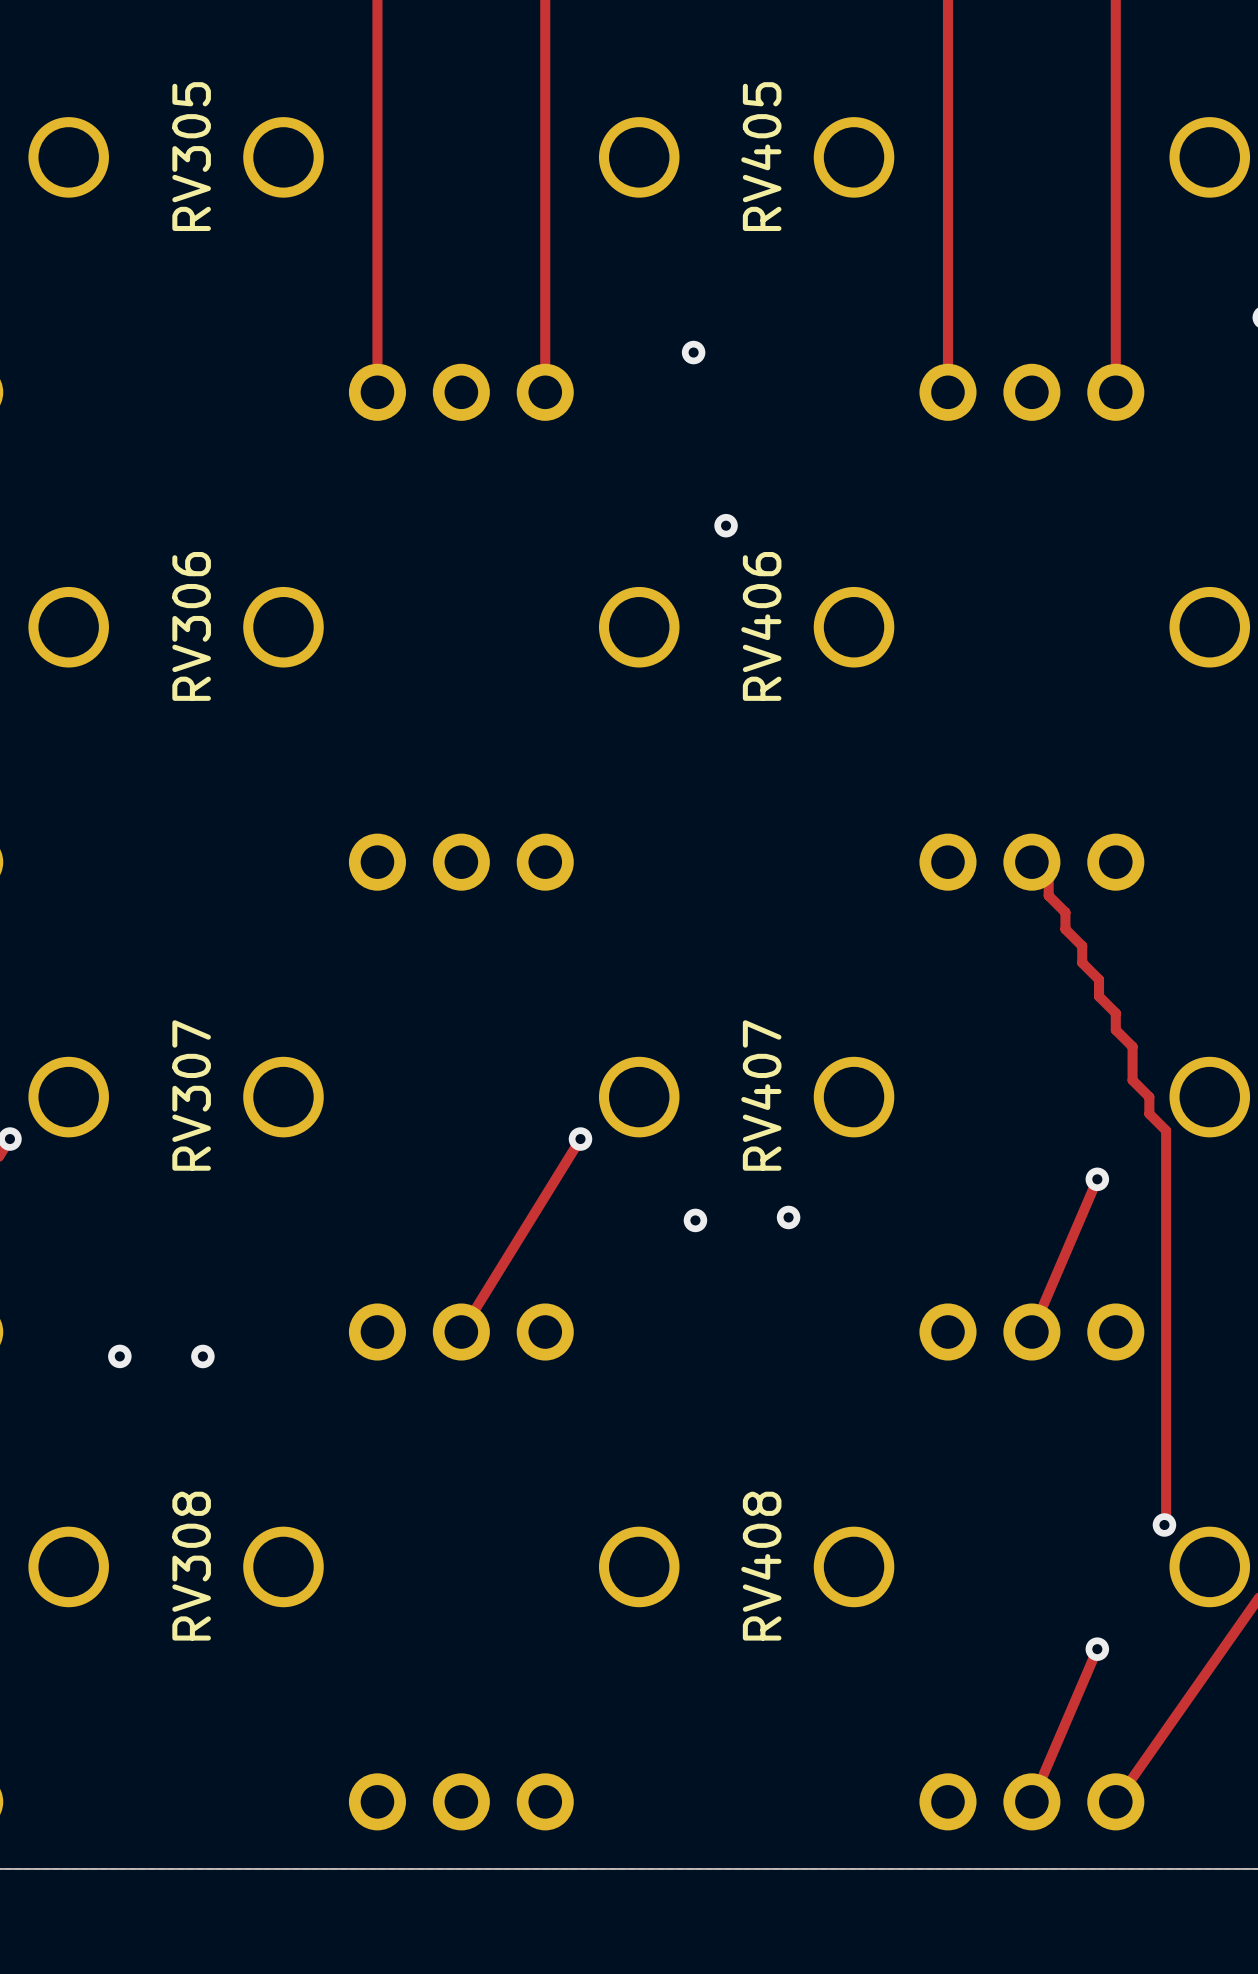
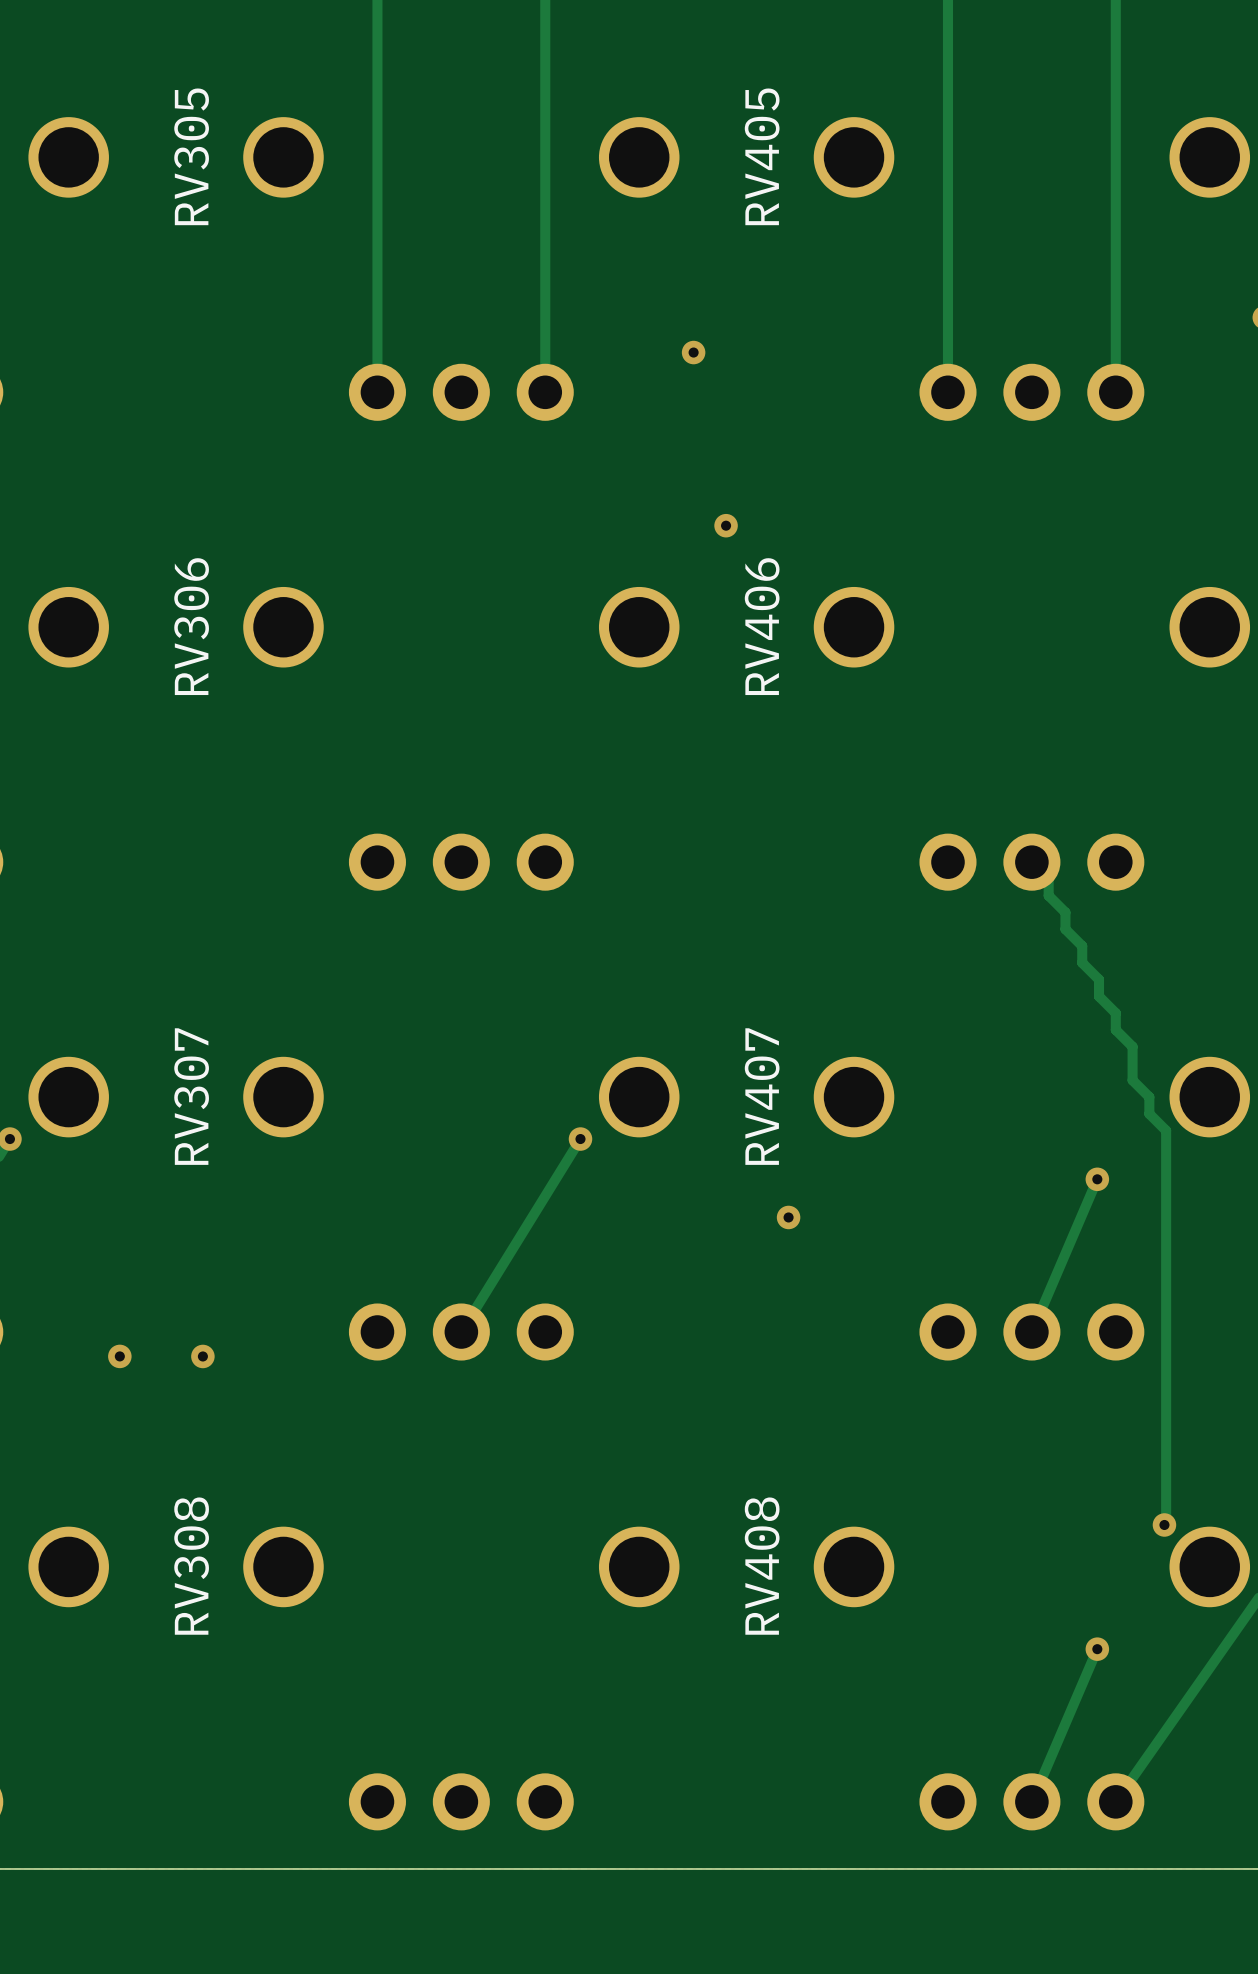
via: (695, 1220) -> none

